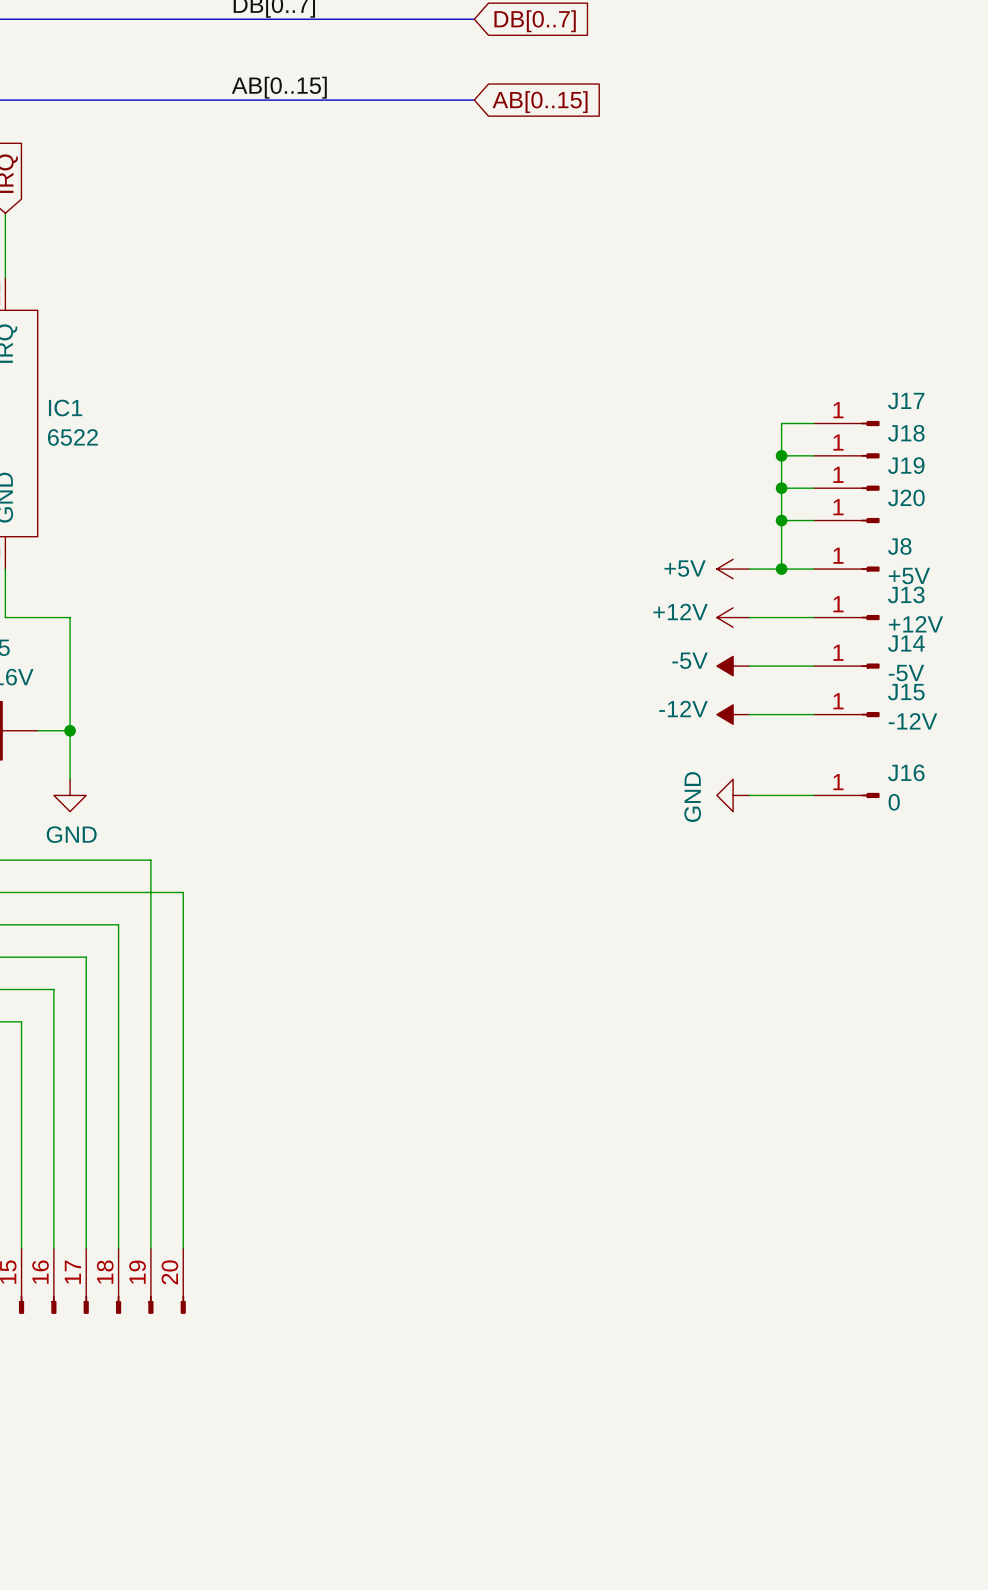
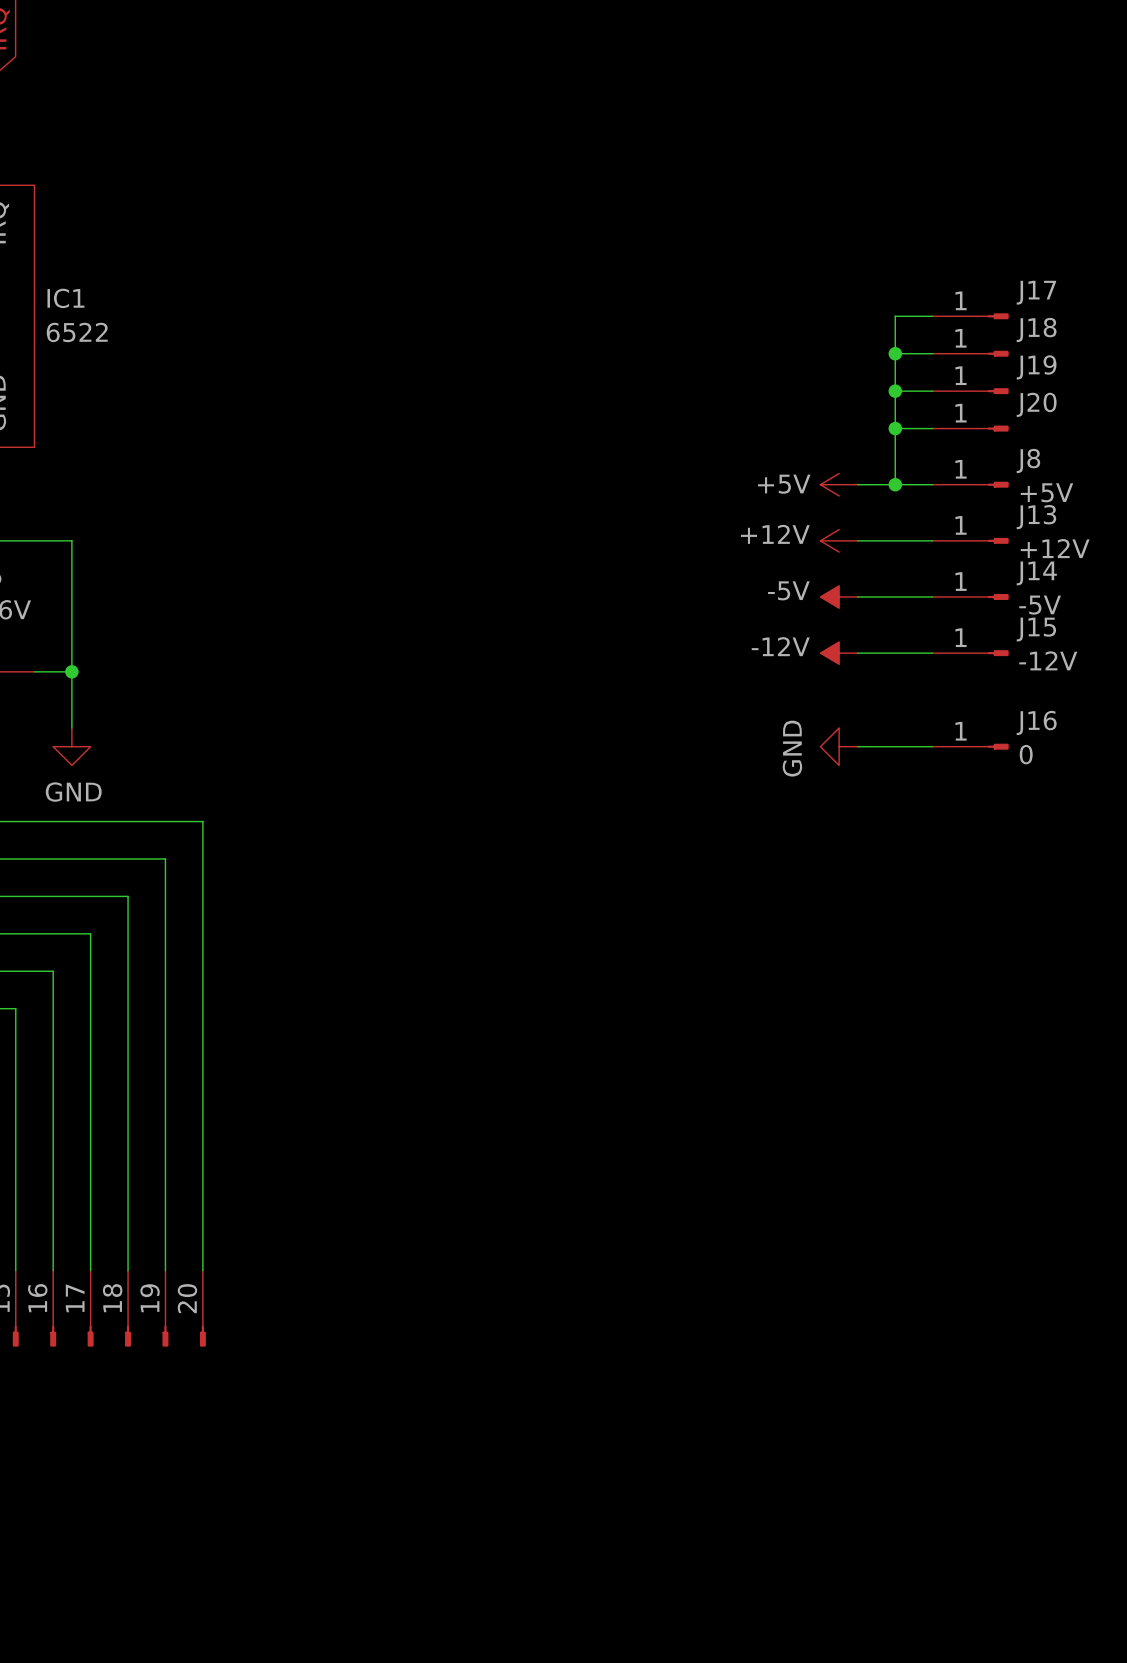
wire: (150, 860) (150, 892) (183, 892) -> (165, 821) (202, 821) (202, 858)

